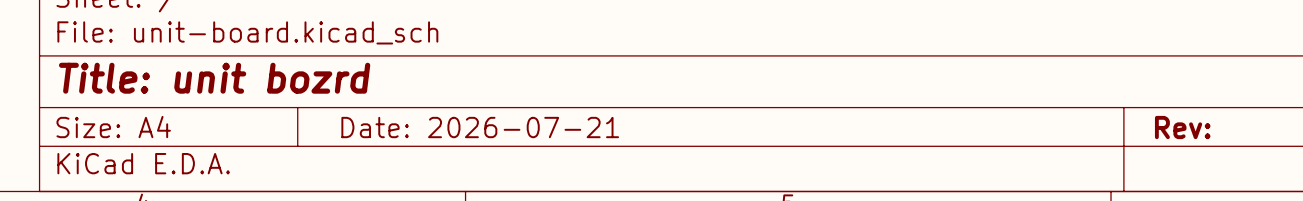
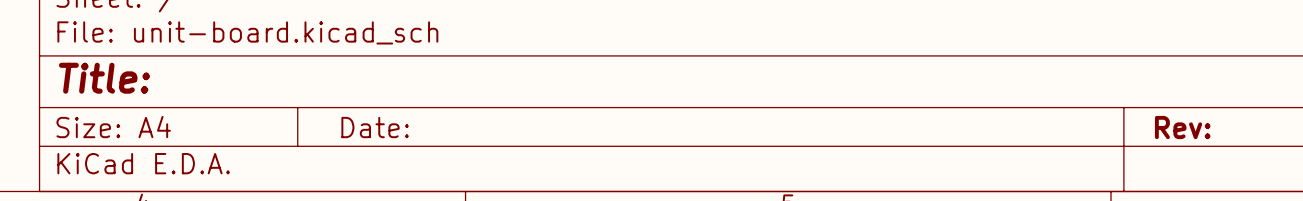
title block: Title: unit bozrd (214, 78) -> Title: (104, 78)
title block: Date: 2026-07-21 (480, 127) -> Date: (375, 127)

